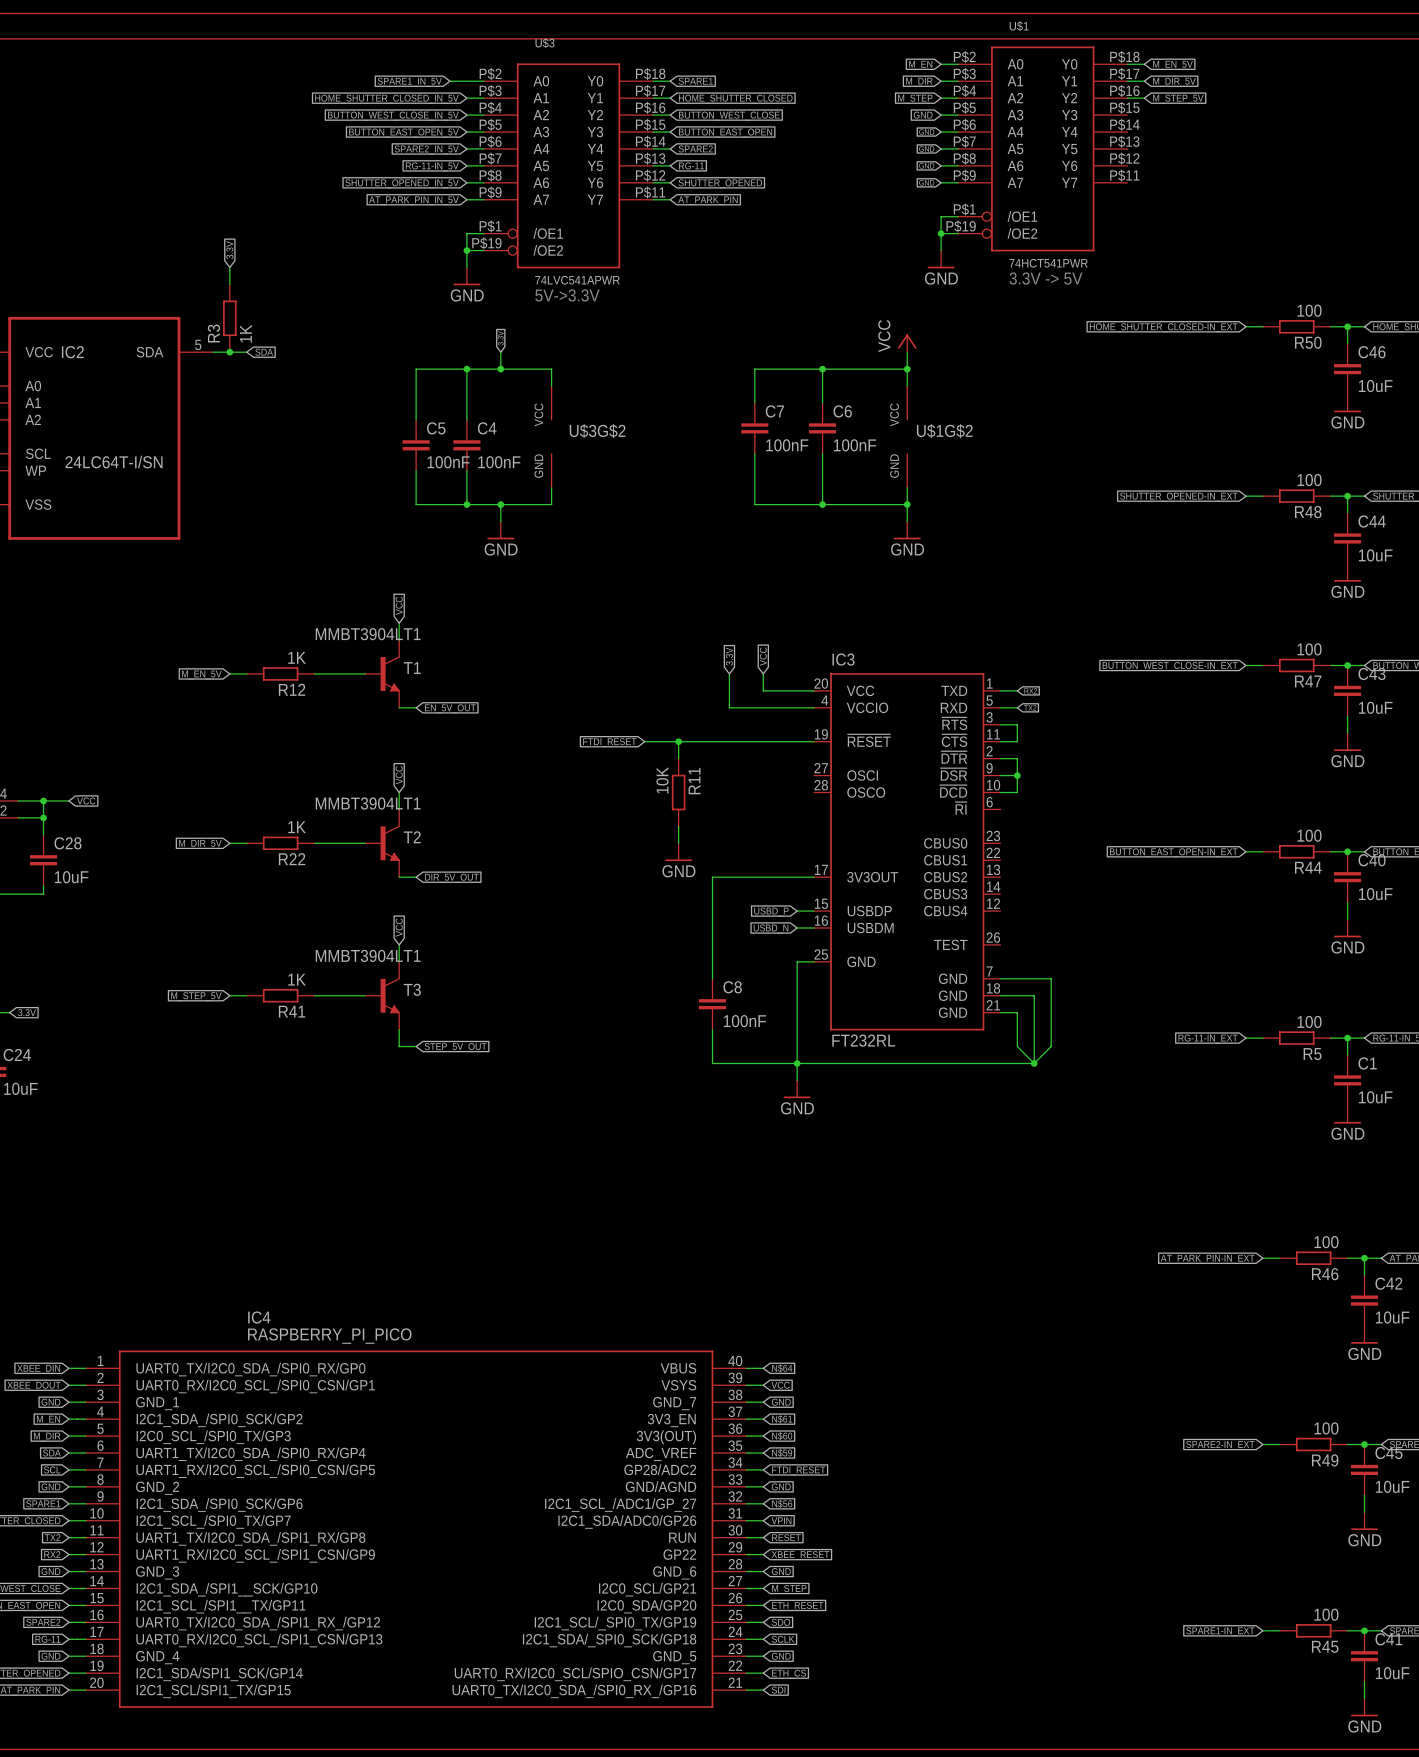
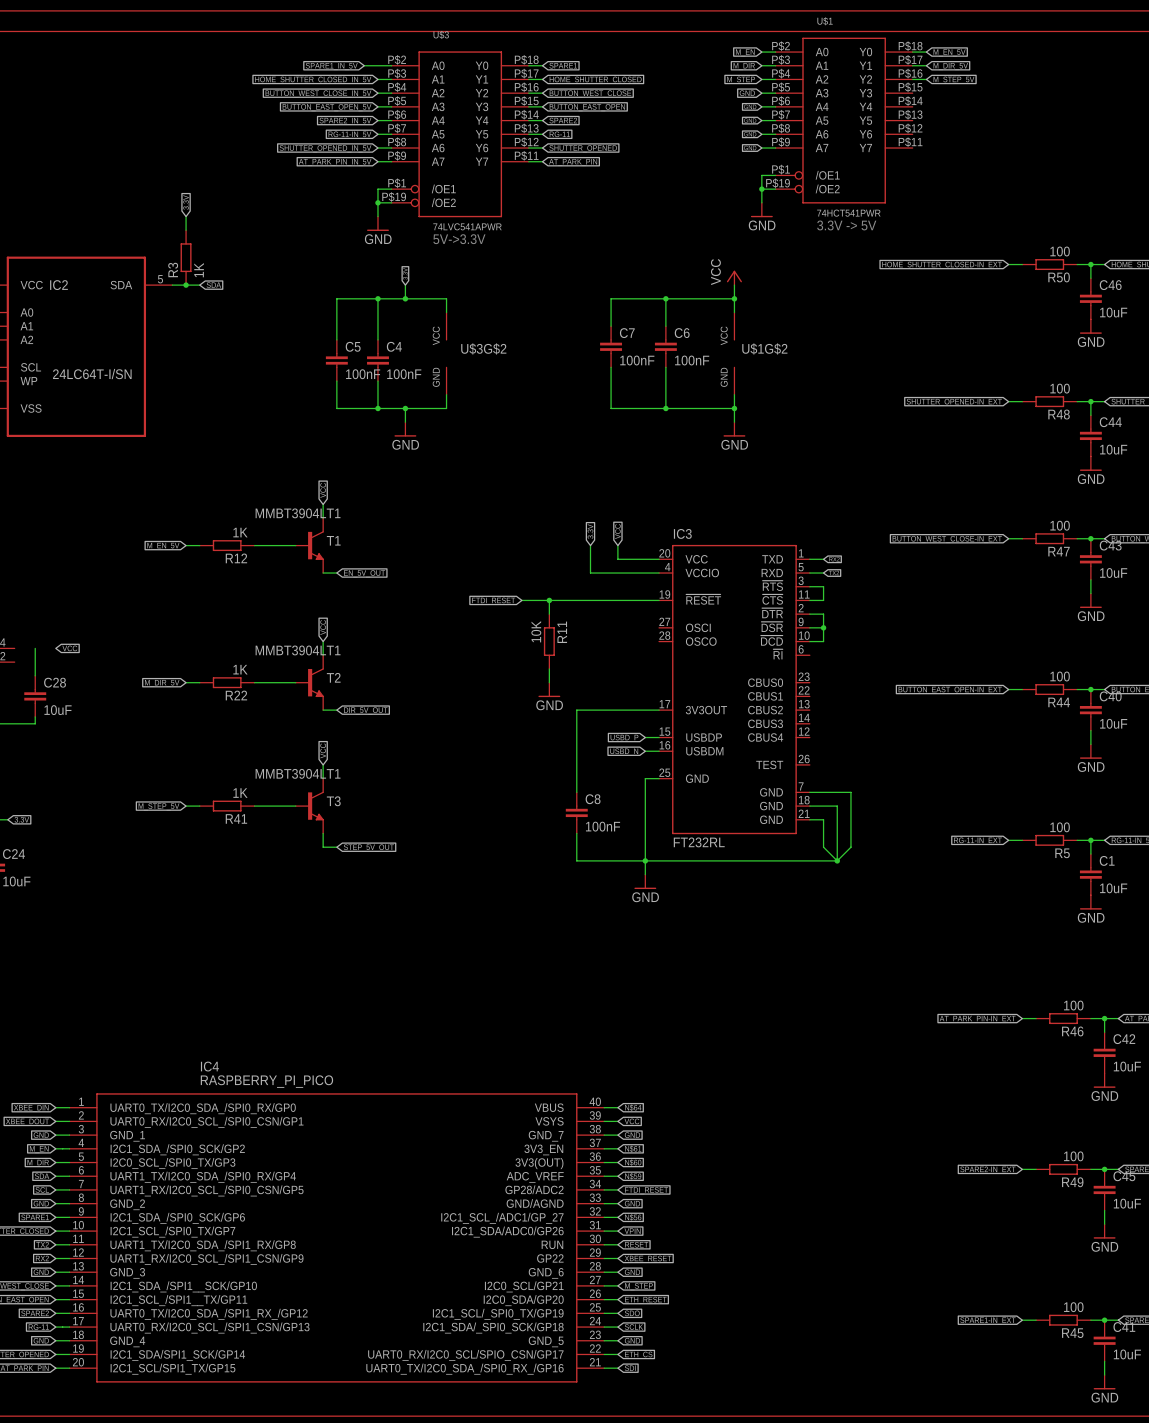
wire: (18, 800) (68, 800) -> none
junction: (43, 800) -> none
wire: (18, 817) (43, 817) -> none
junction: (43, 817) -> none

